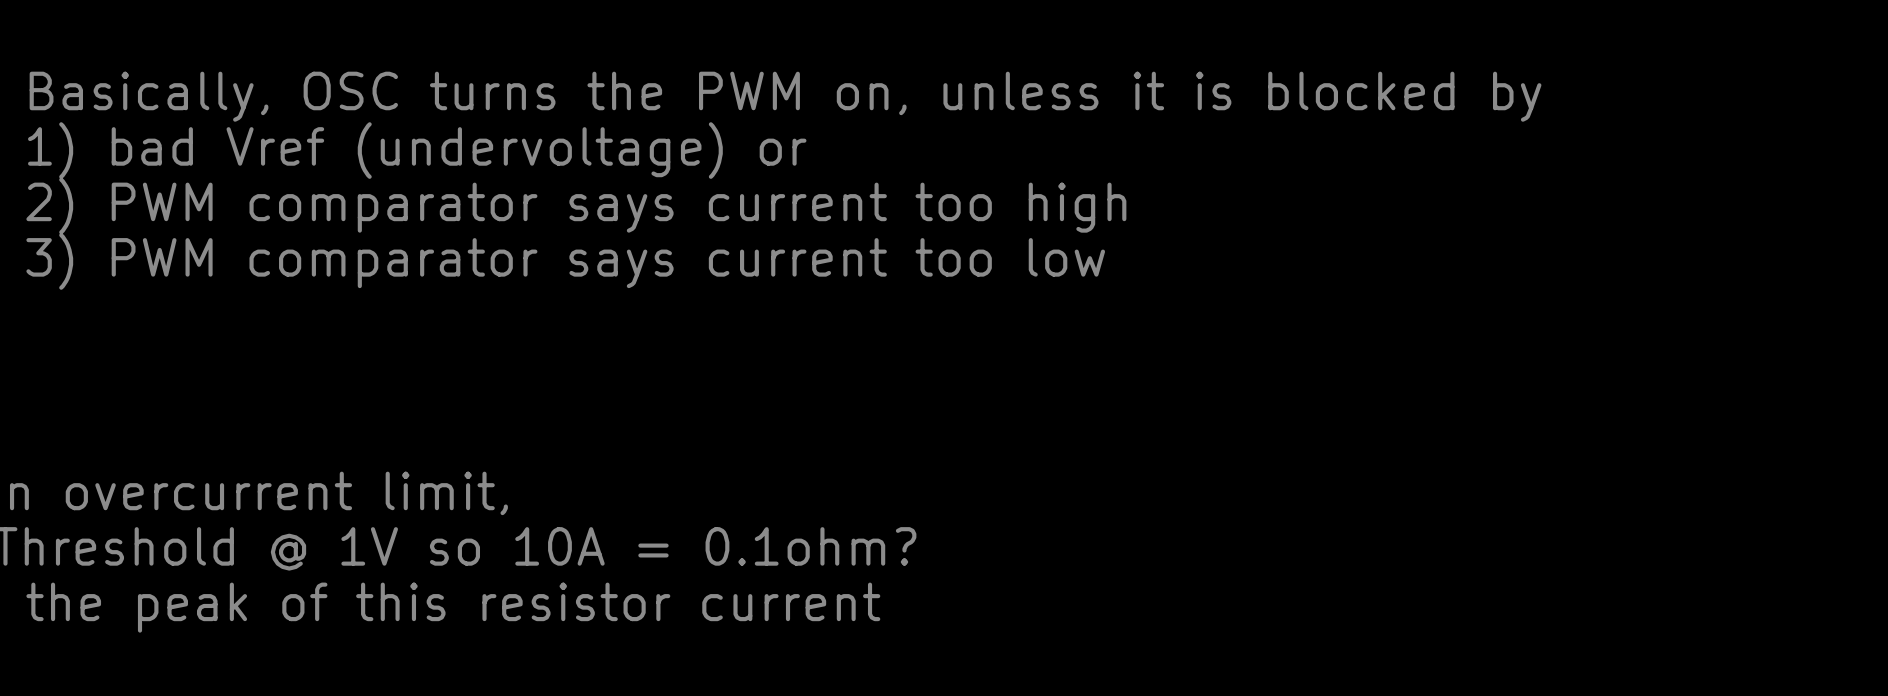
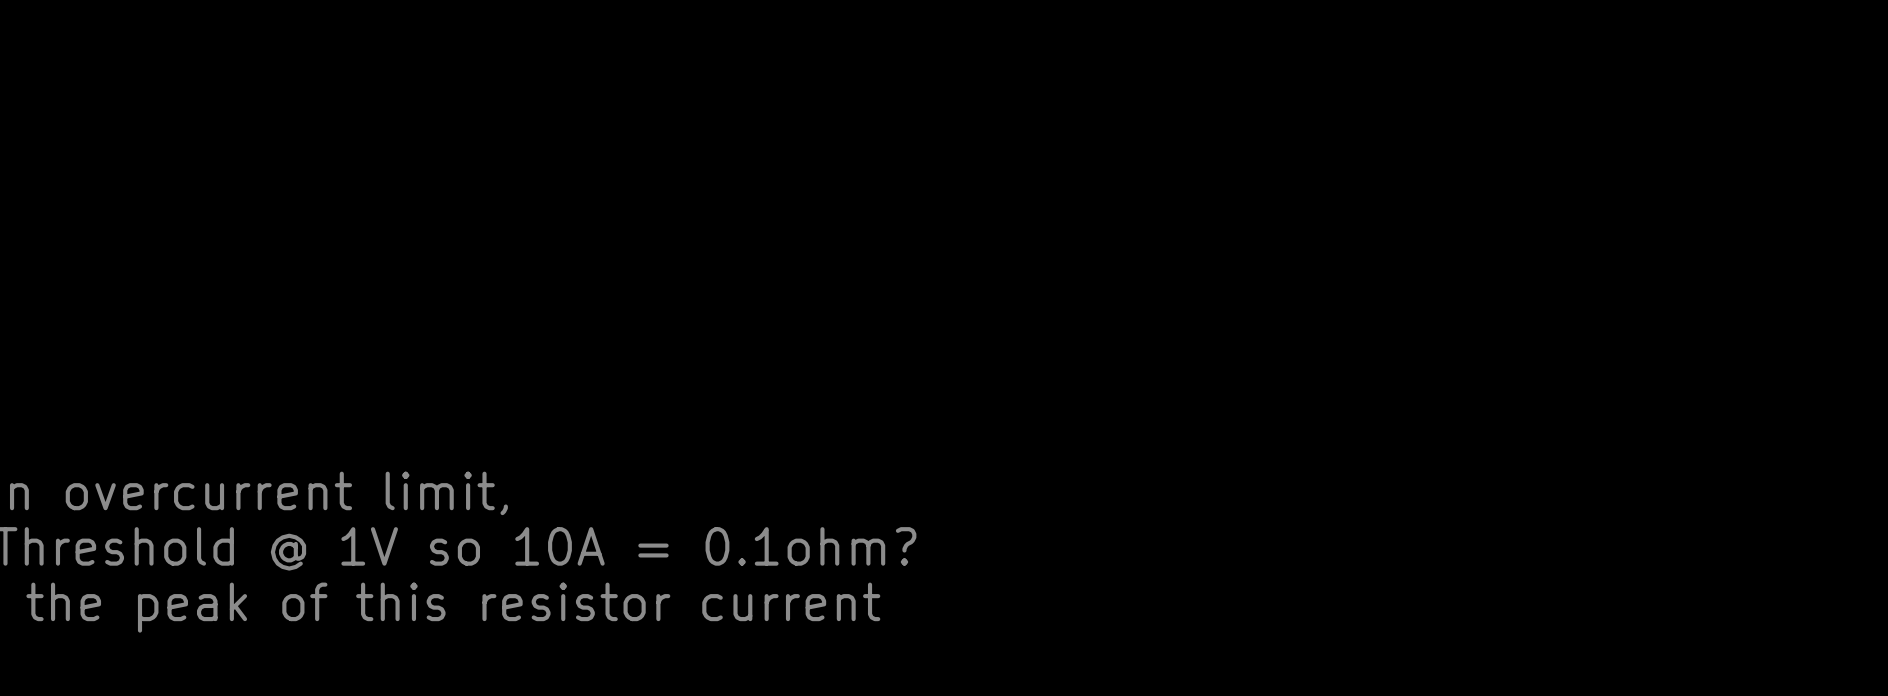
text: Basically, OSC turns the PWM on, unless it is blocked by (785, 96) -> none
text: 1) bad Vref (undervoltage) or (417, 150) -> none
text: 2) PWM comparator says current too high (576, 206) -> none
text: 3) PWM comparator says current too low (565, 261) -> none

